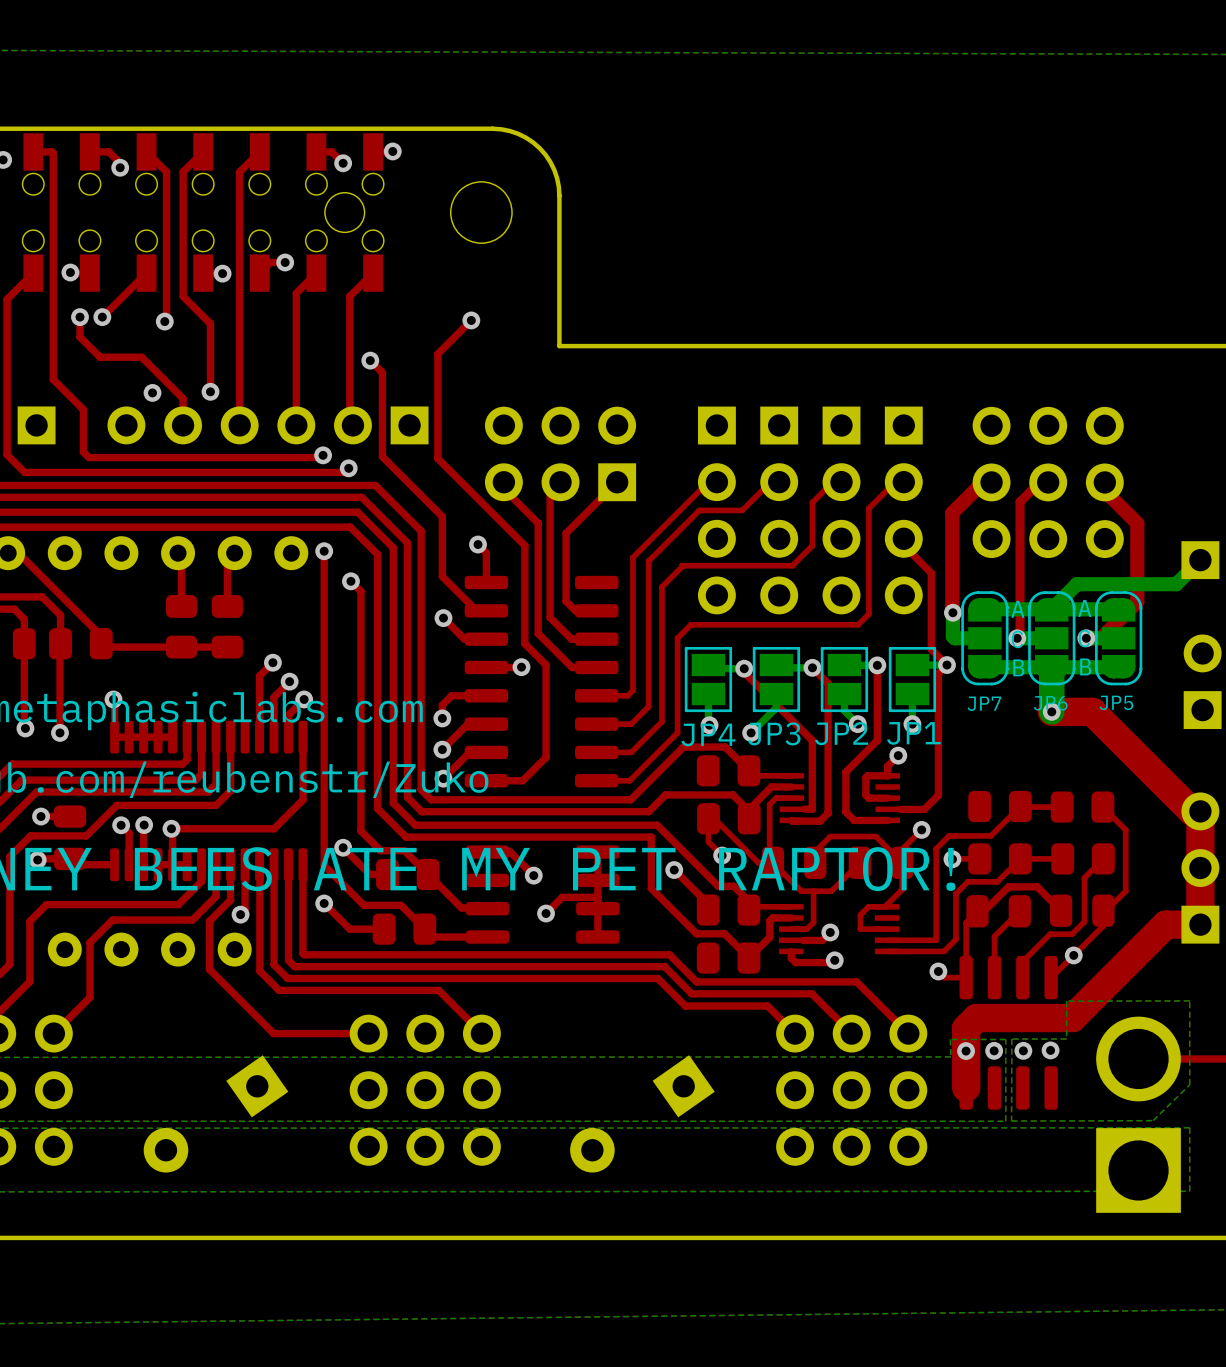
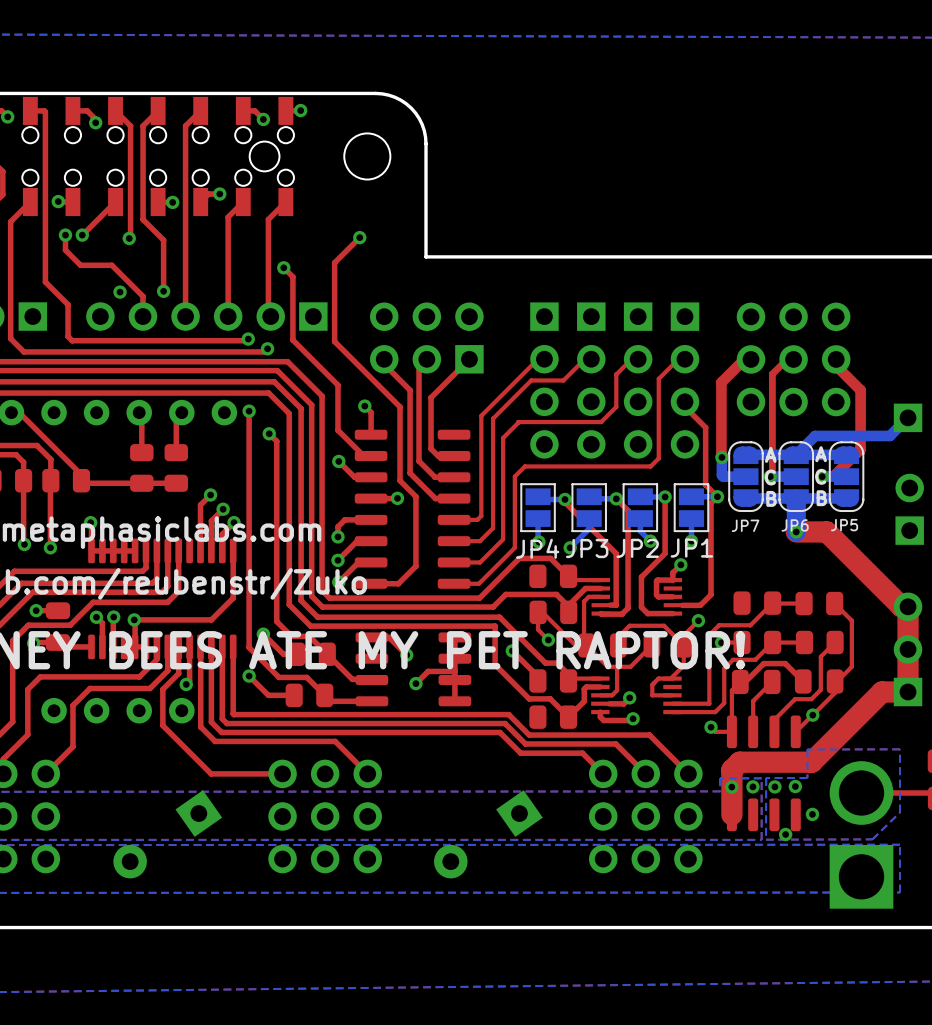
via: none -> (812, 814)
via: none -> (785, 834)

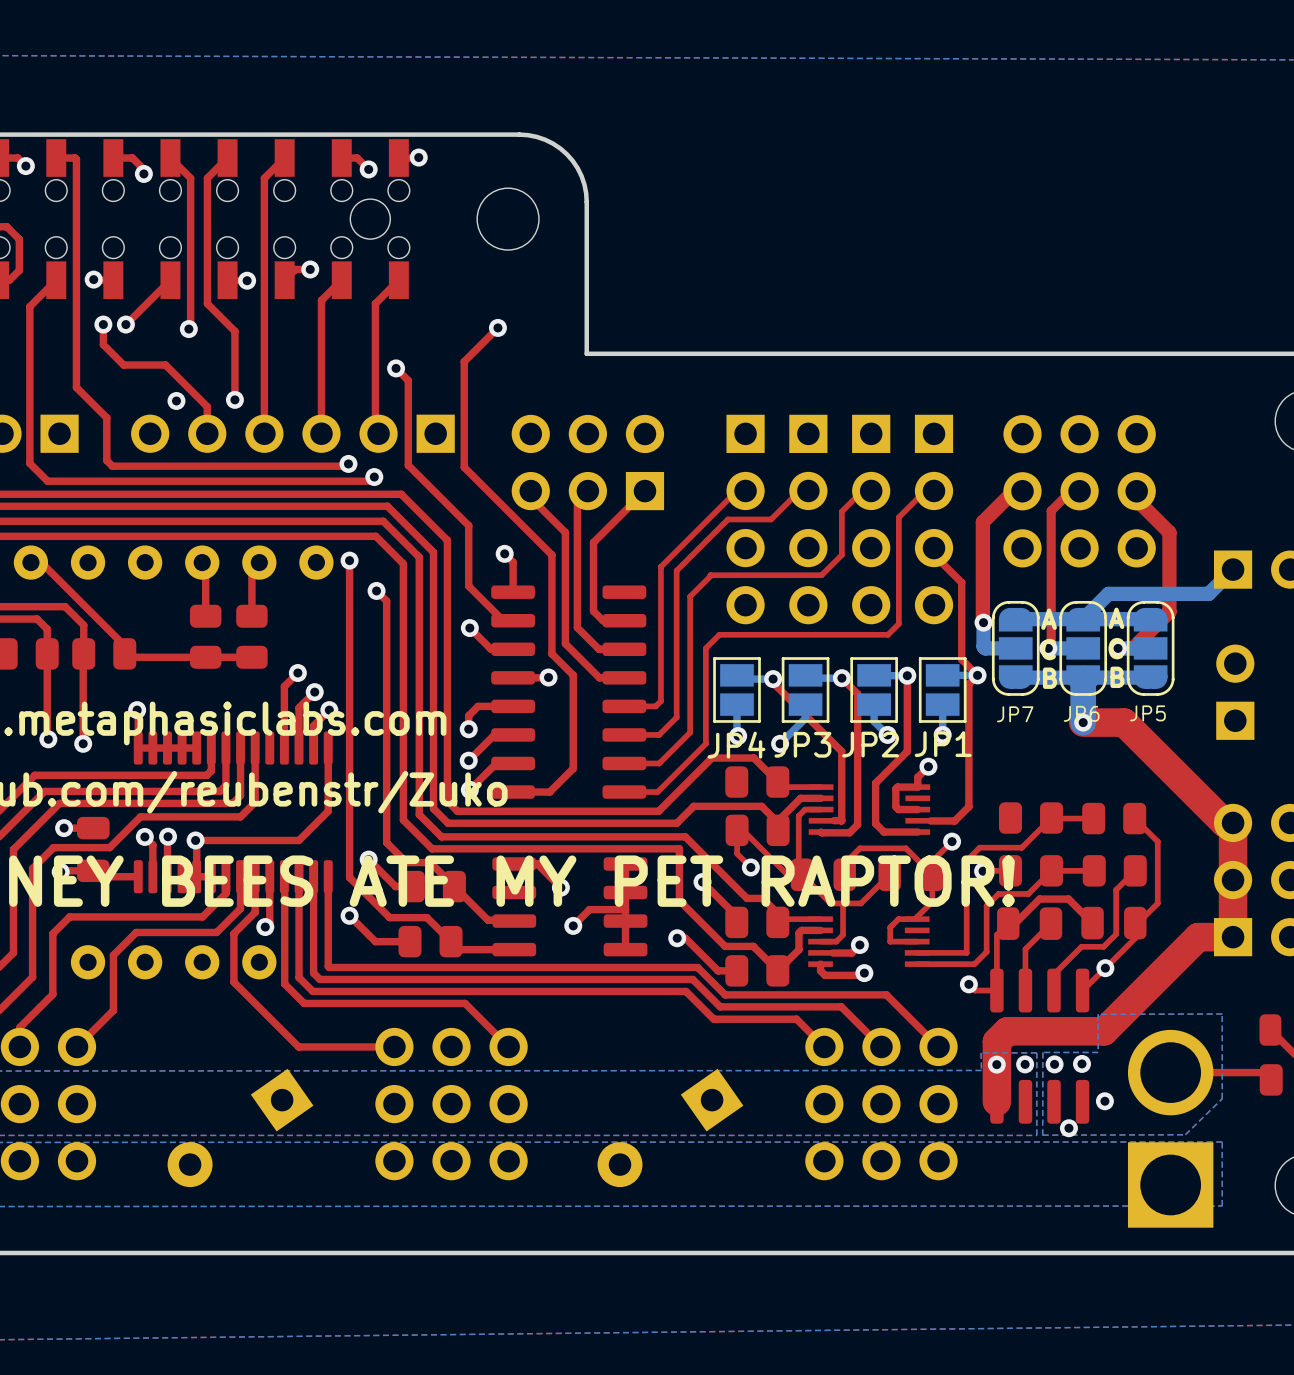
top track: none -> (677, 938) (685, 938) (718, 970) (736, 970)
via: none -> (677, 938)

